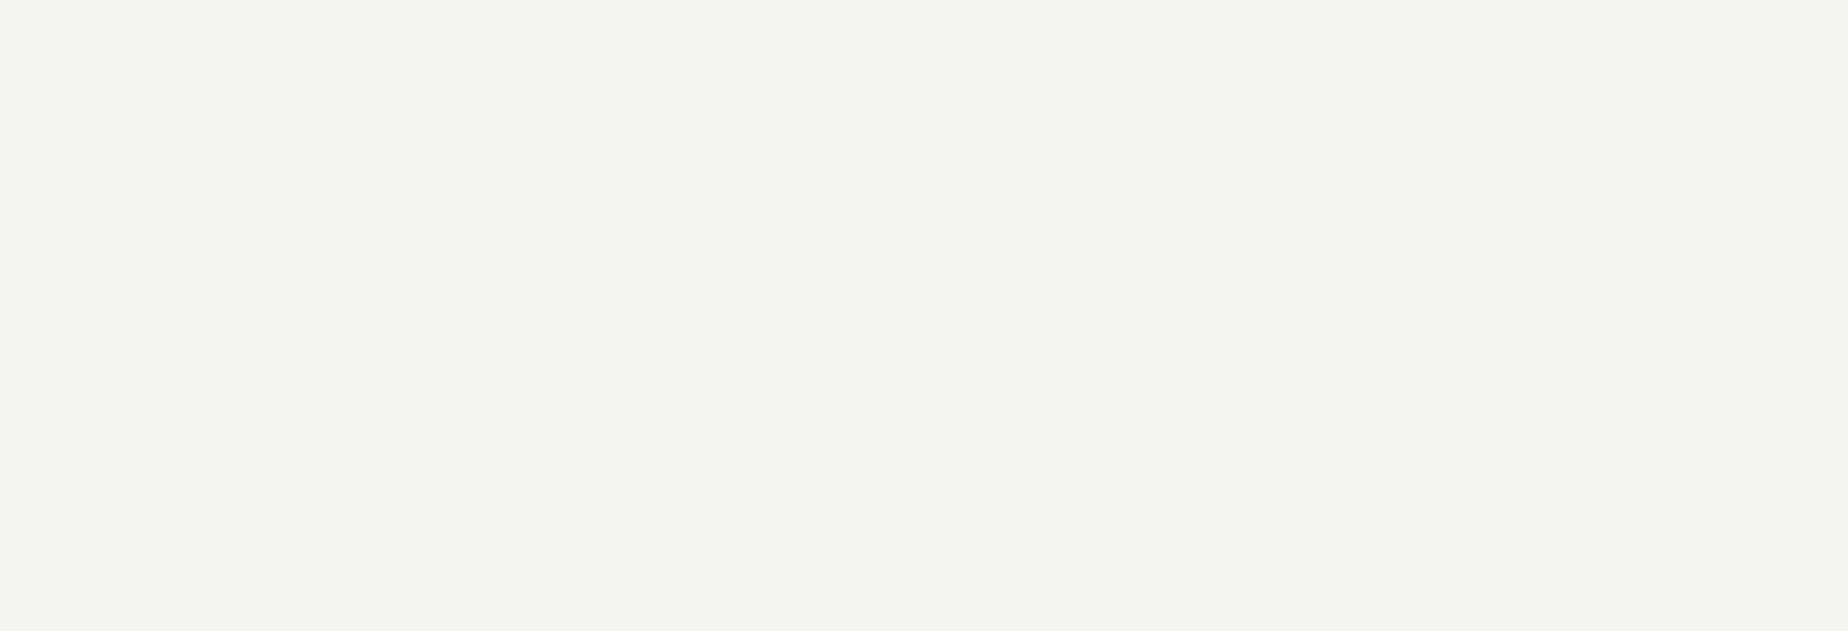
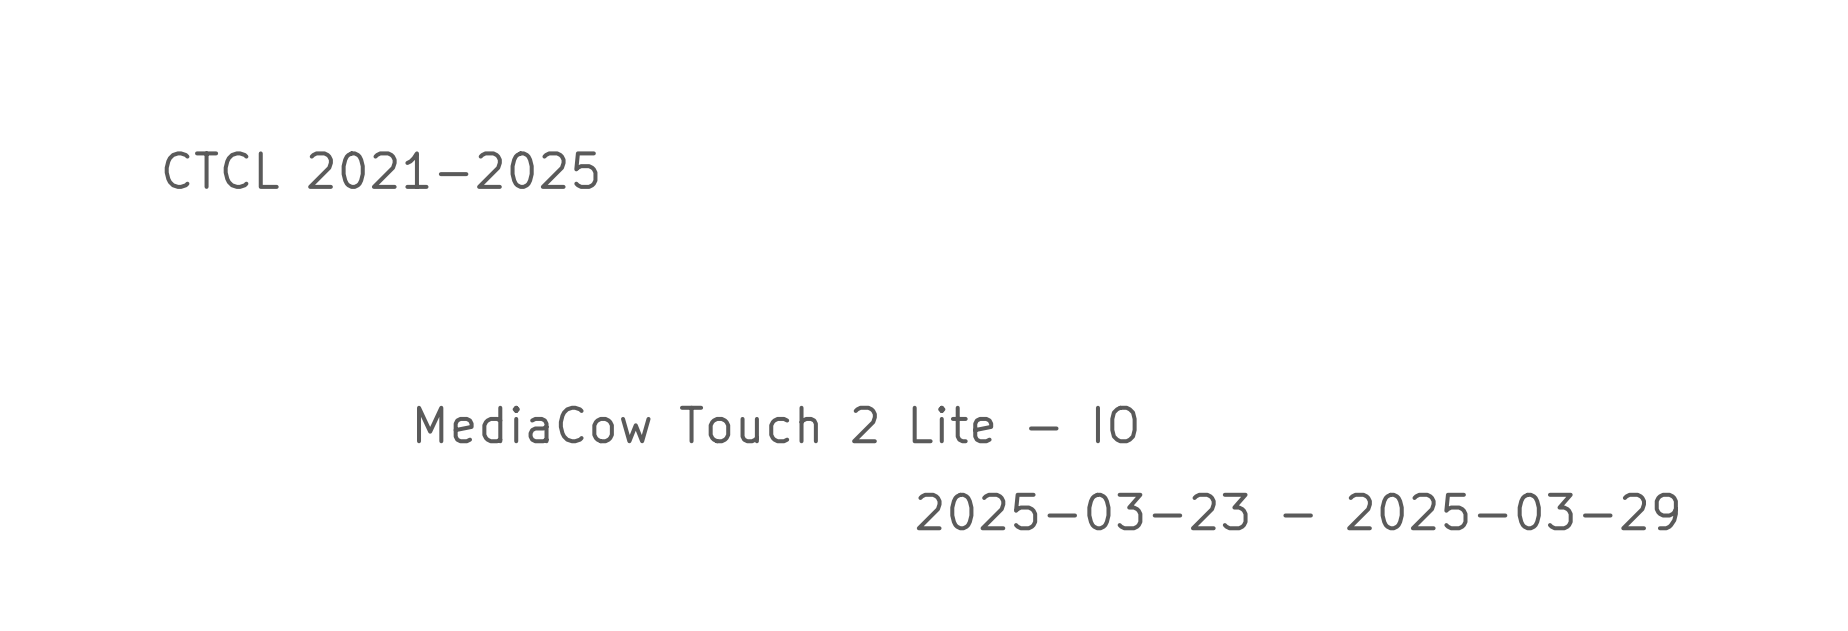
text: none -> CTCL 2021-2025 (381, 170)
text: none -> MediaCow Touch 2 Lite - IO (776, 424)
text: none -> 2025-03-23 - 2025-03-29 (1297, 511)

